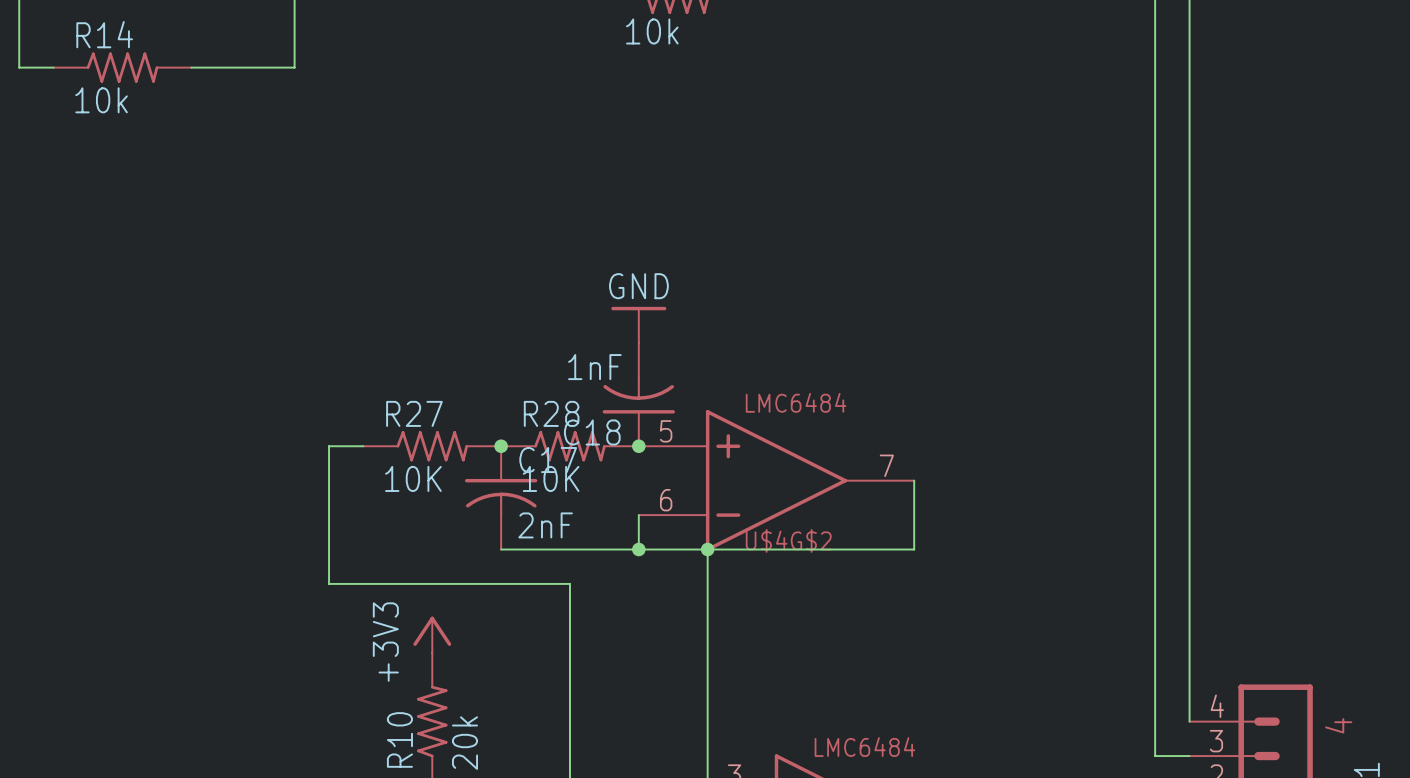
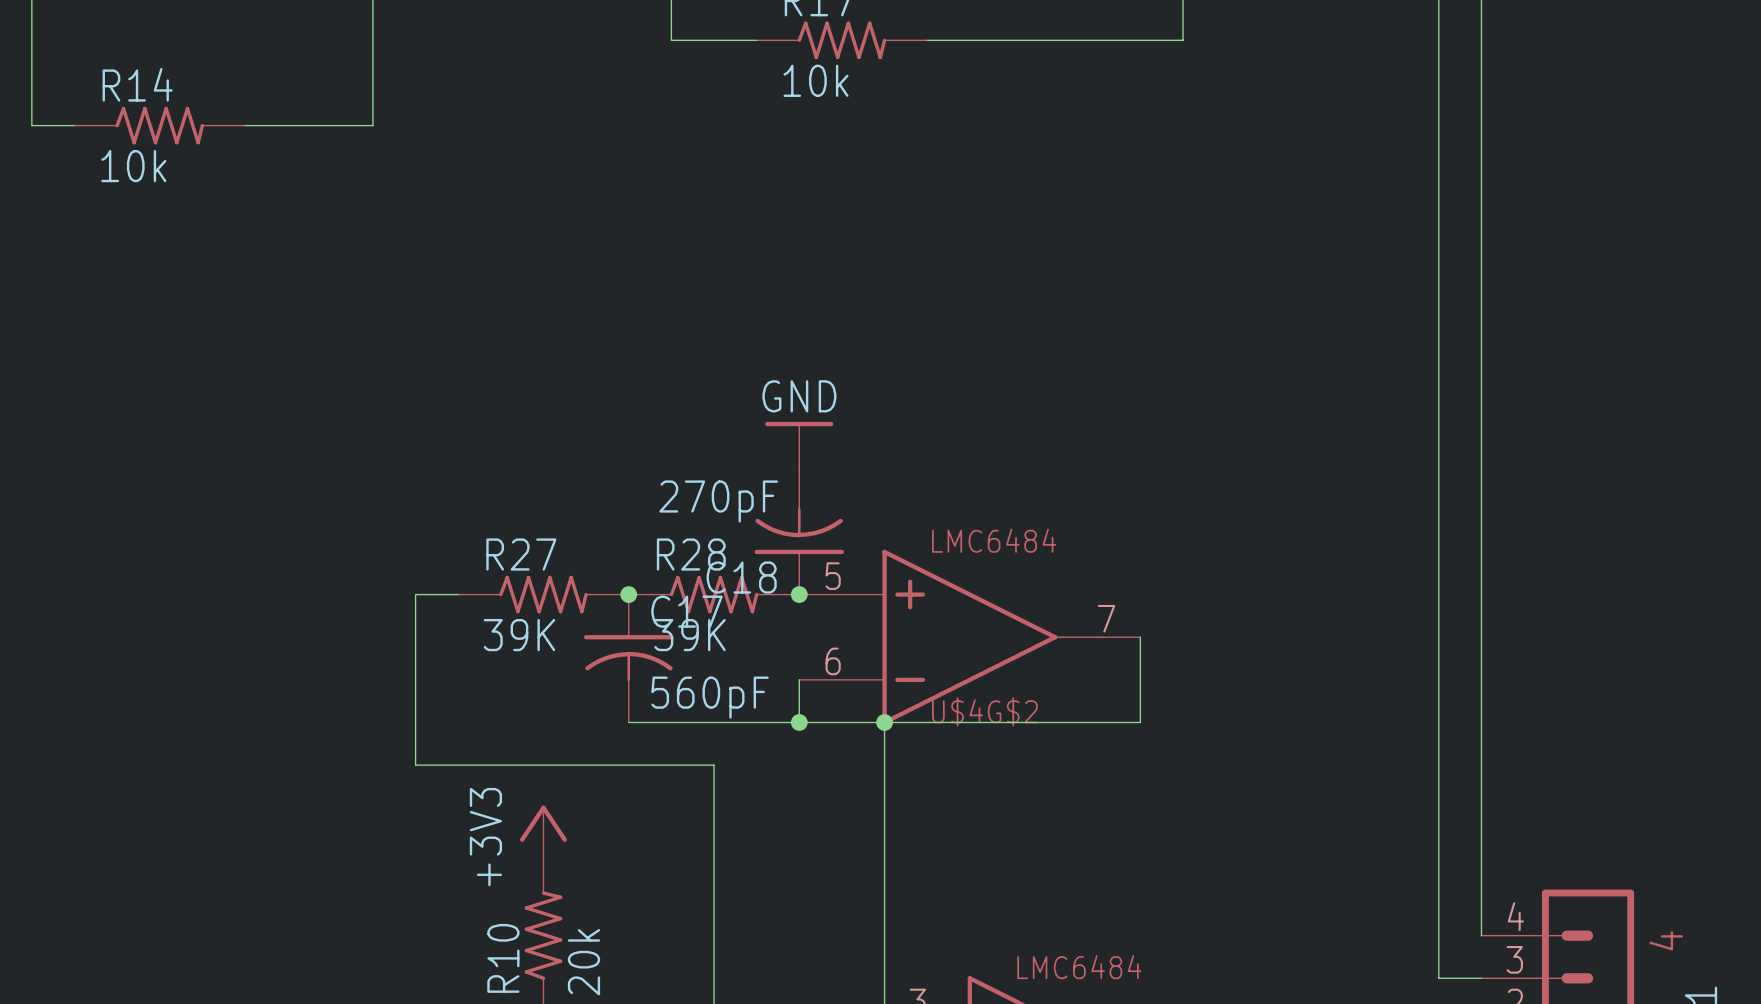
C18 value: 1nF (594, 367) -> 270pF (718, 501)
R27 value: 10K (413, 478) -> 39K (519, 635)
R28 value: 10K (551, 478) -> 39K (690, 635)
C17 value: 2nF (545, 525) -> 560pF (710, 697)

